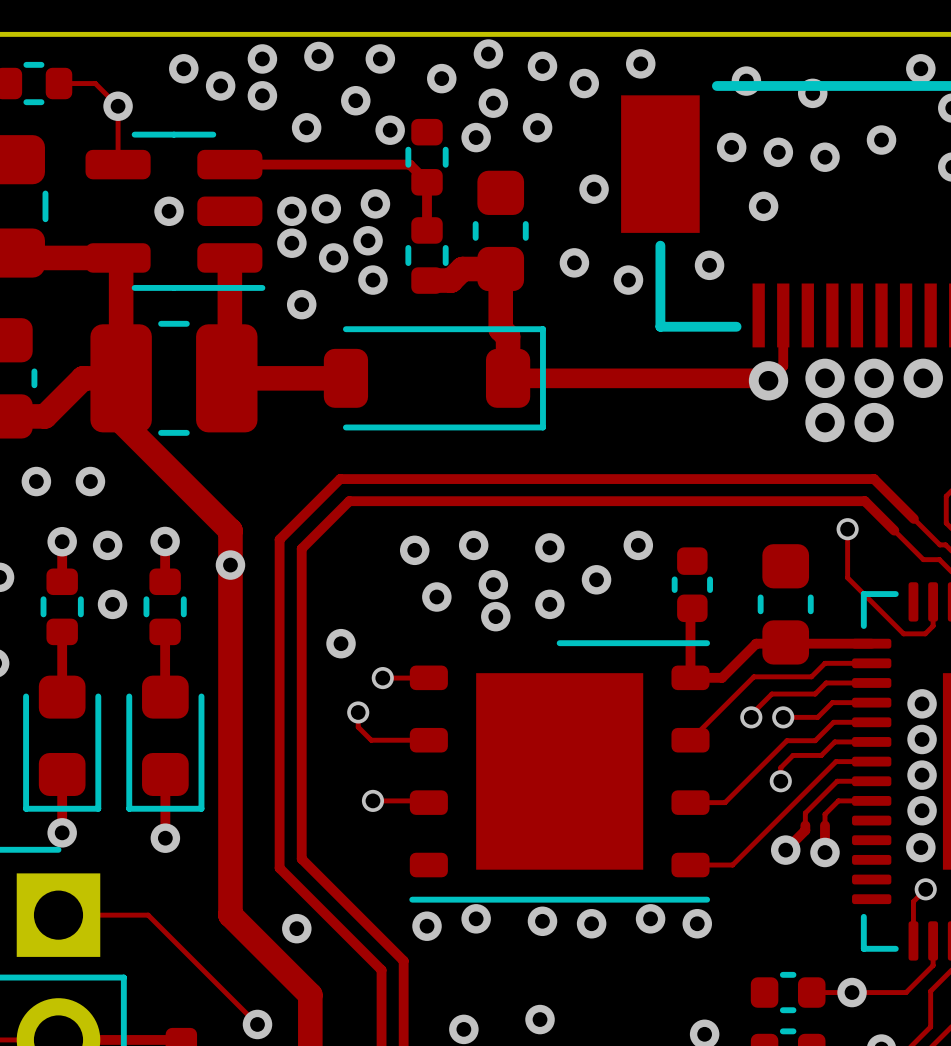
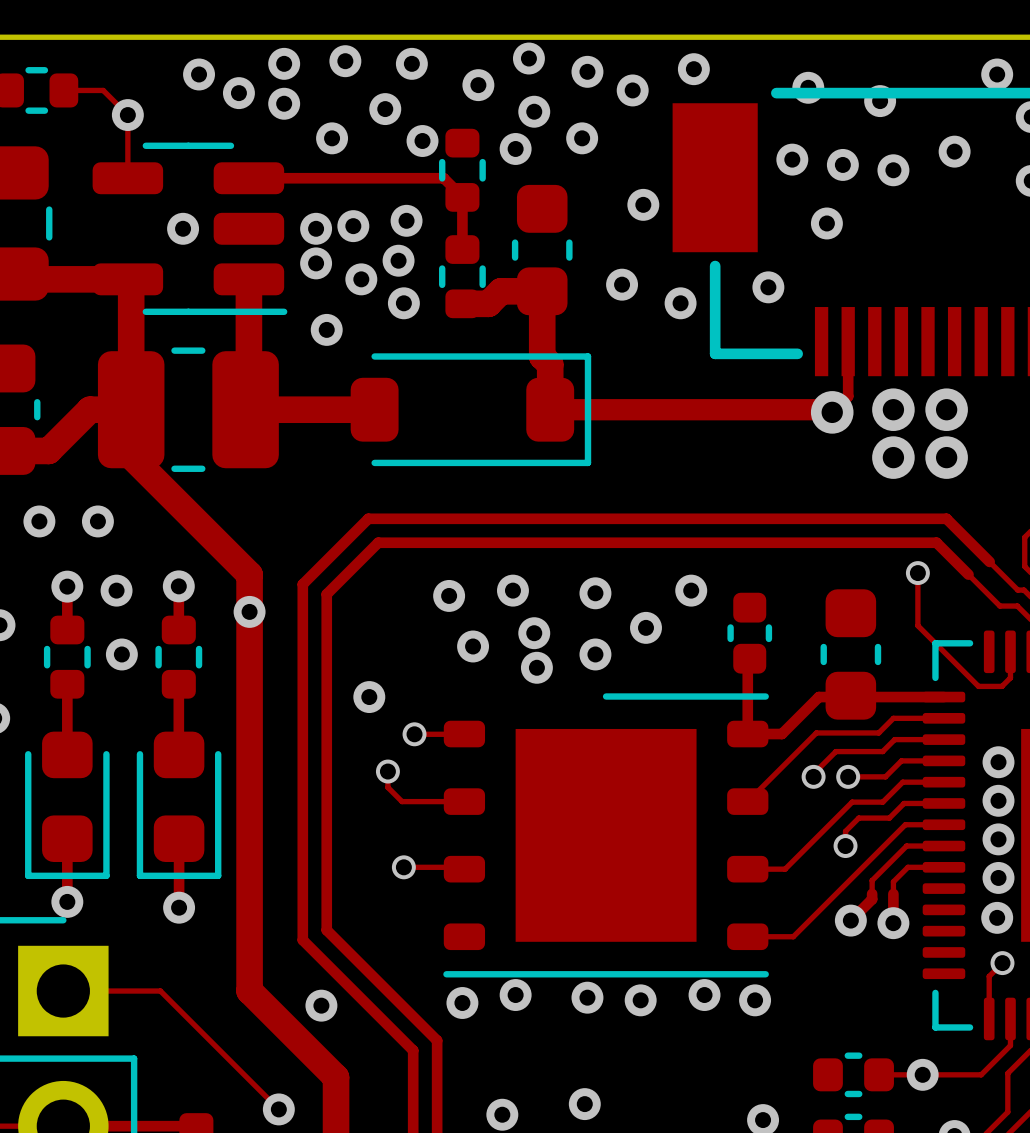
via: (923, 378) -> none

